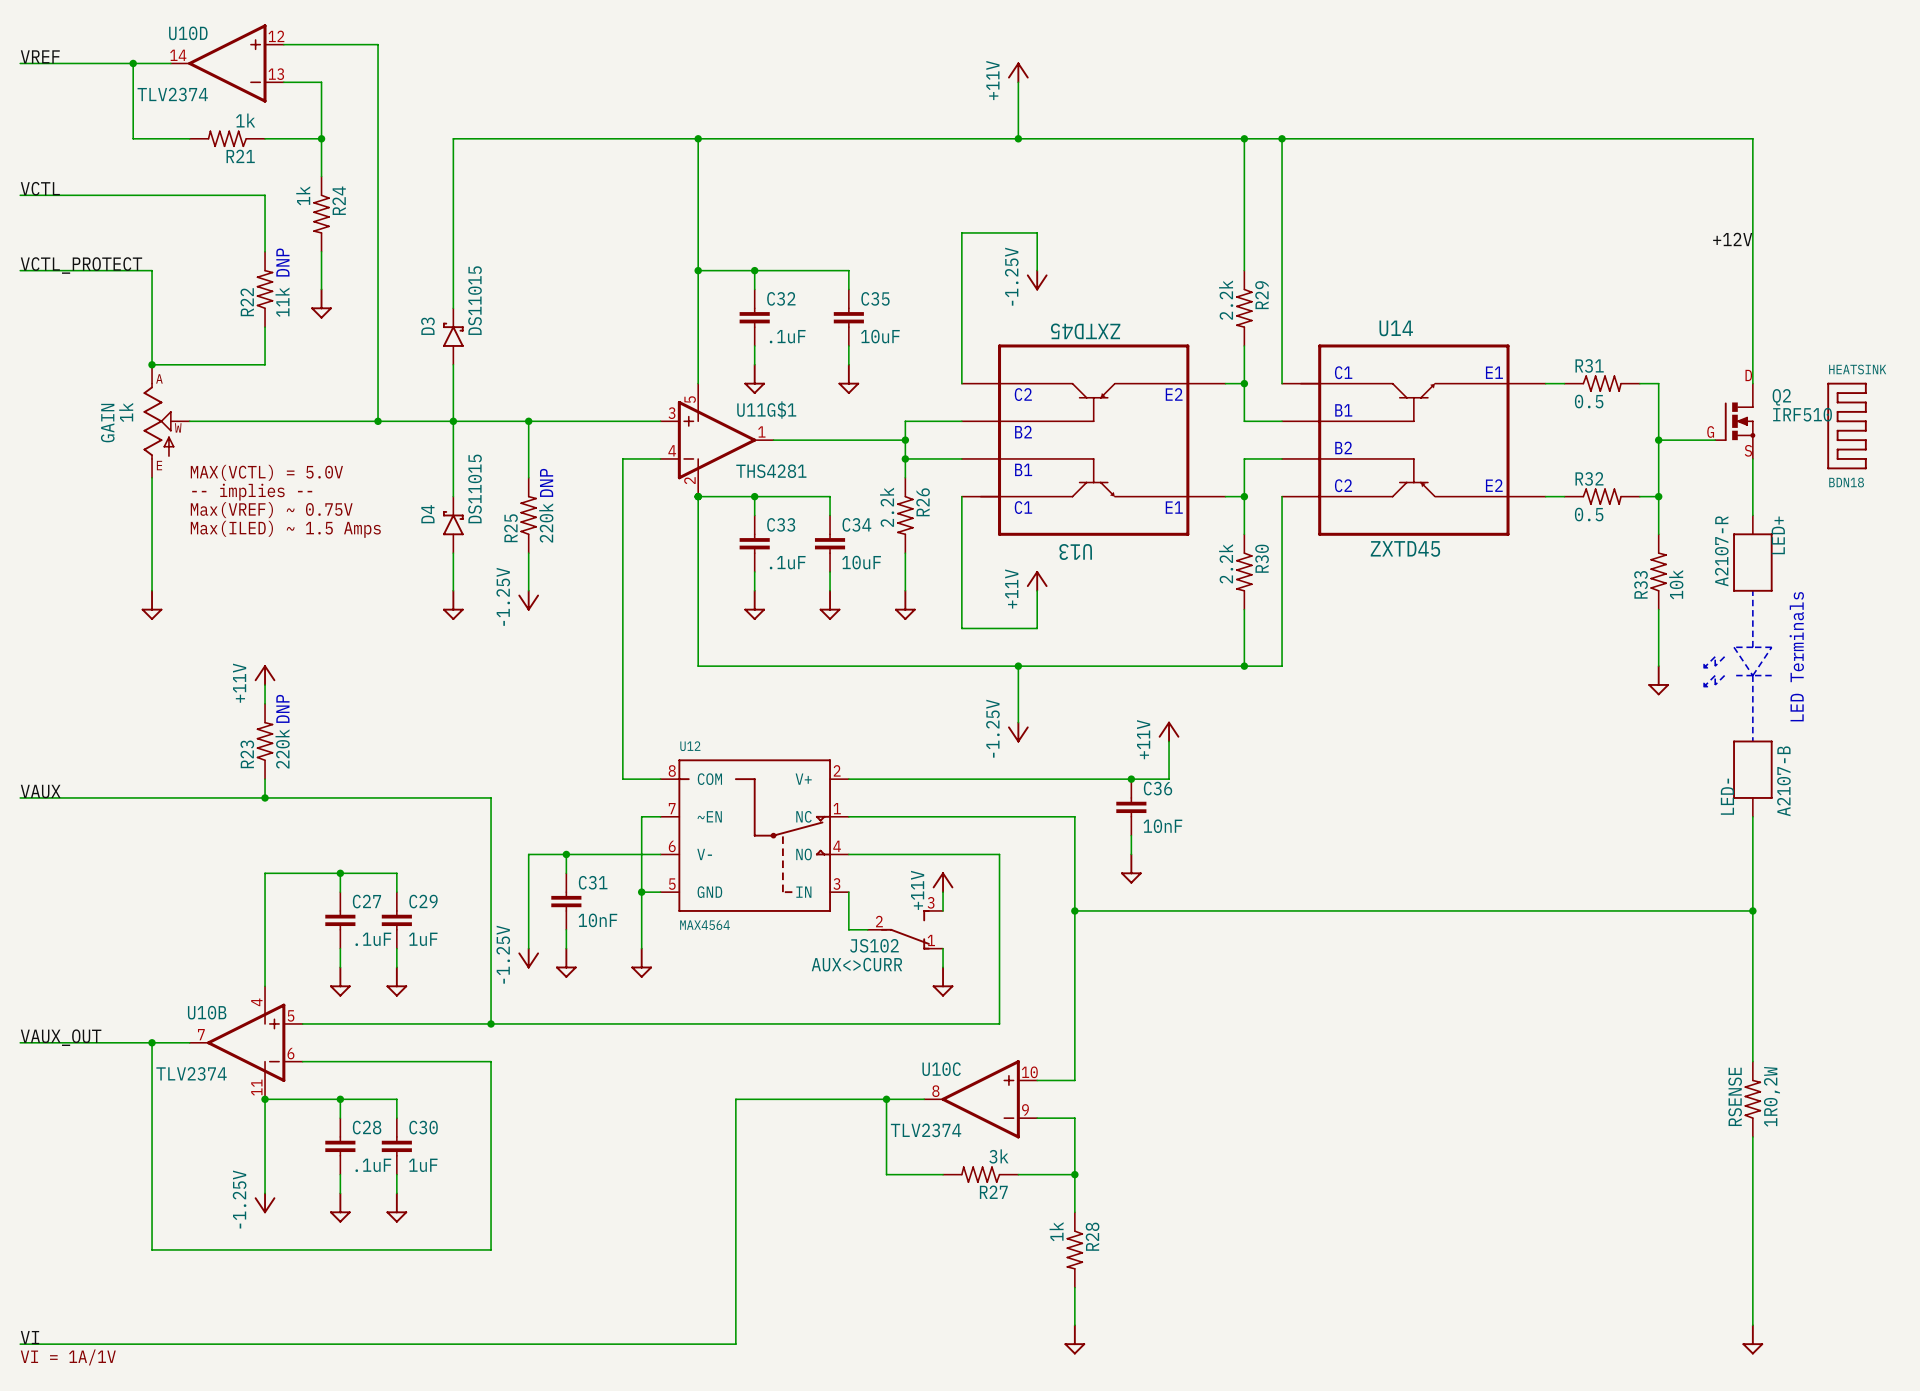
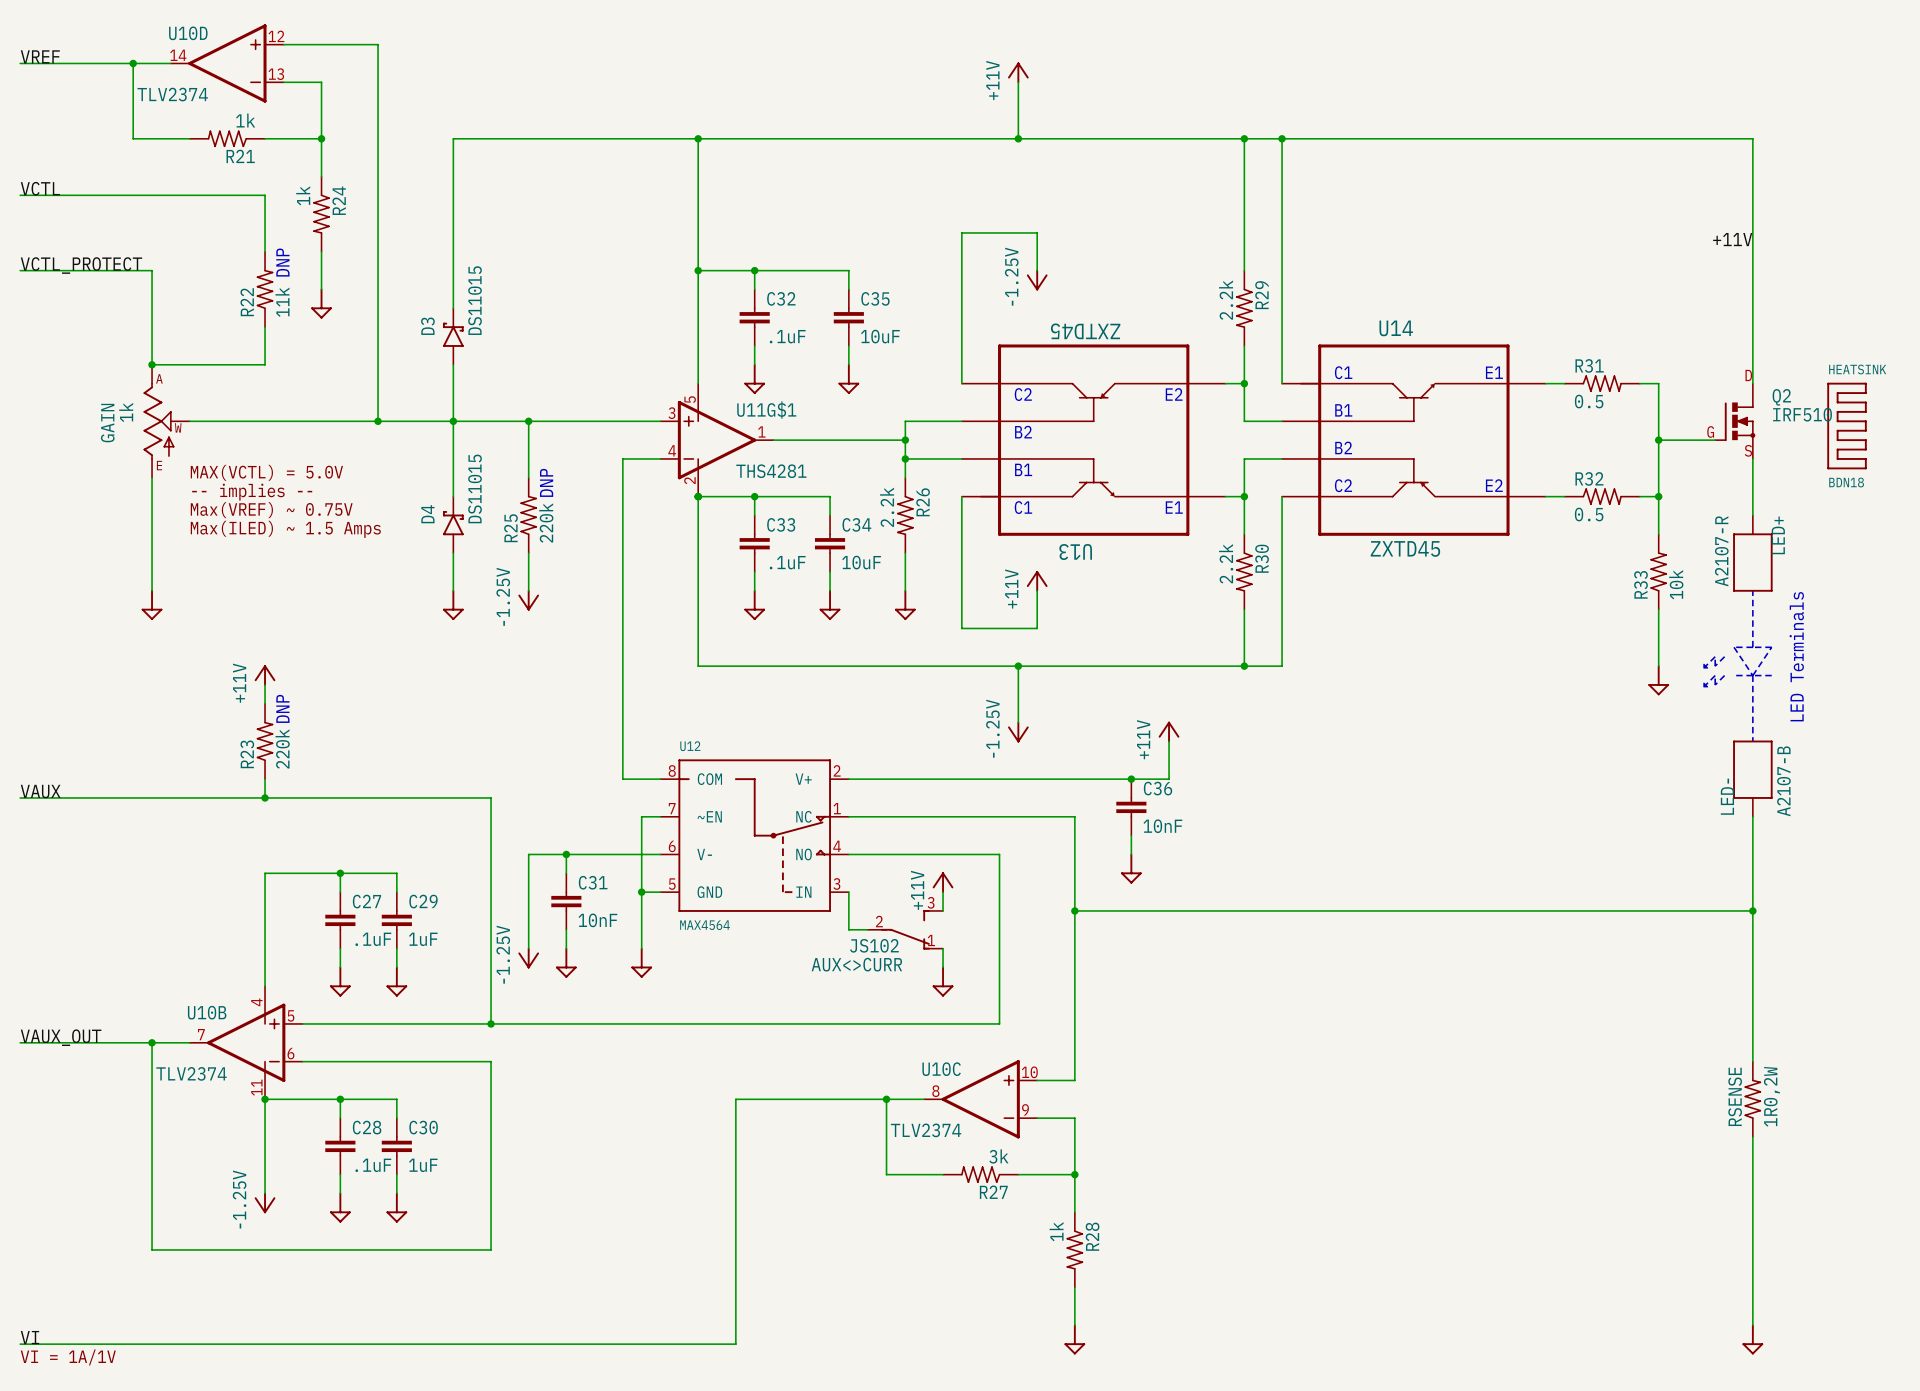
label: +12V (1732, 239) -> +11V (1732, 239)

